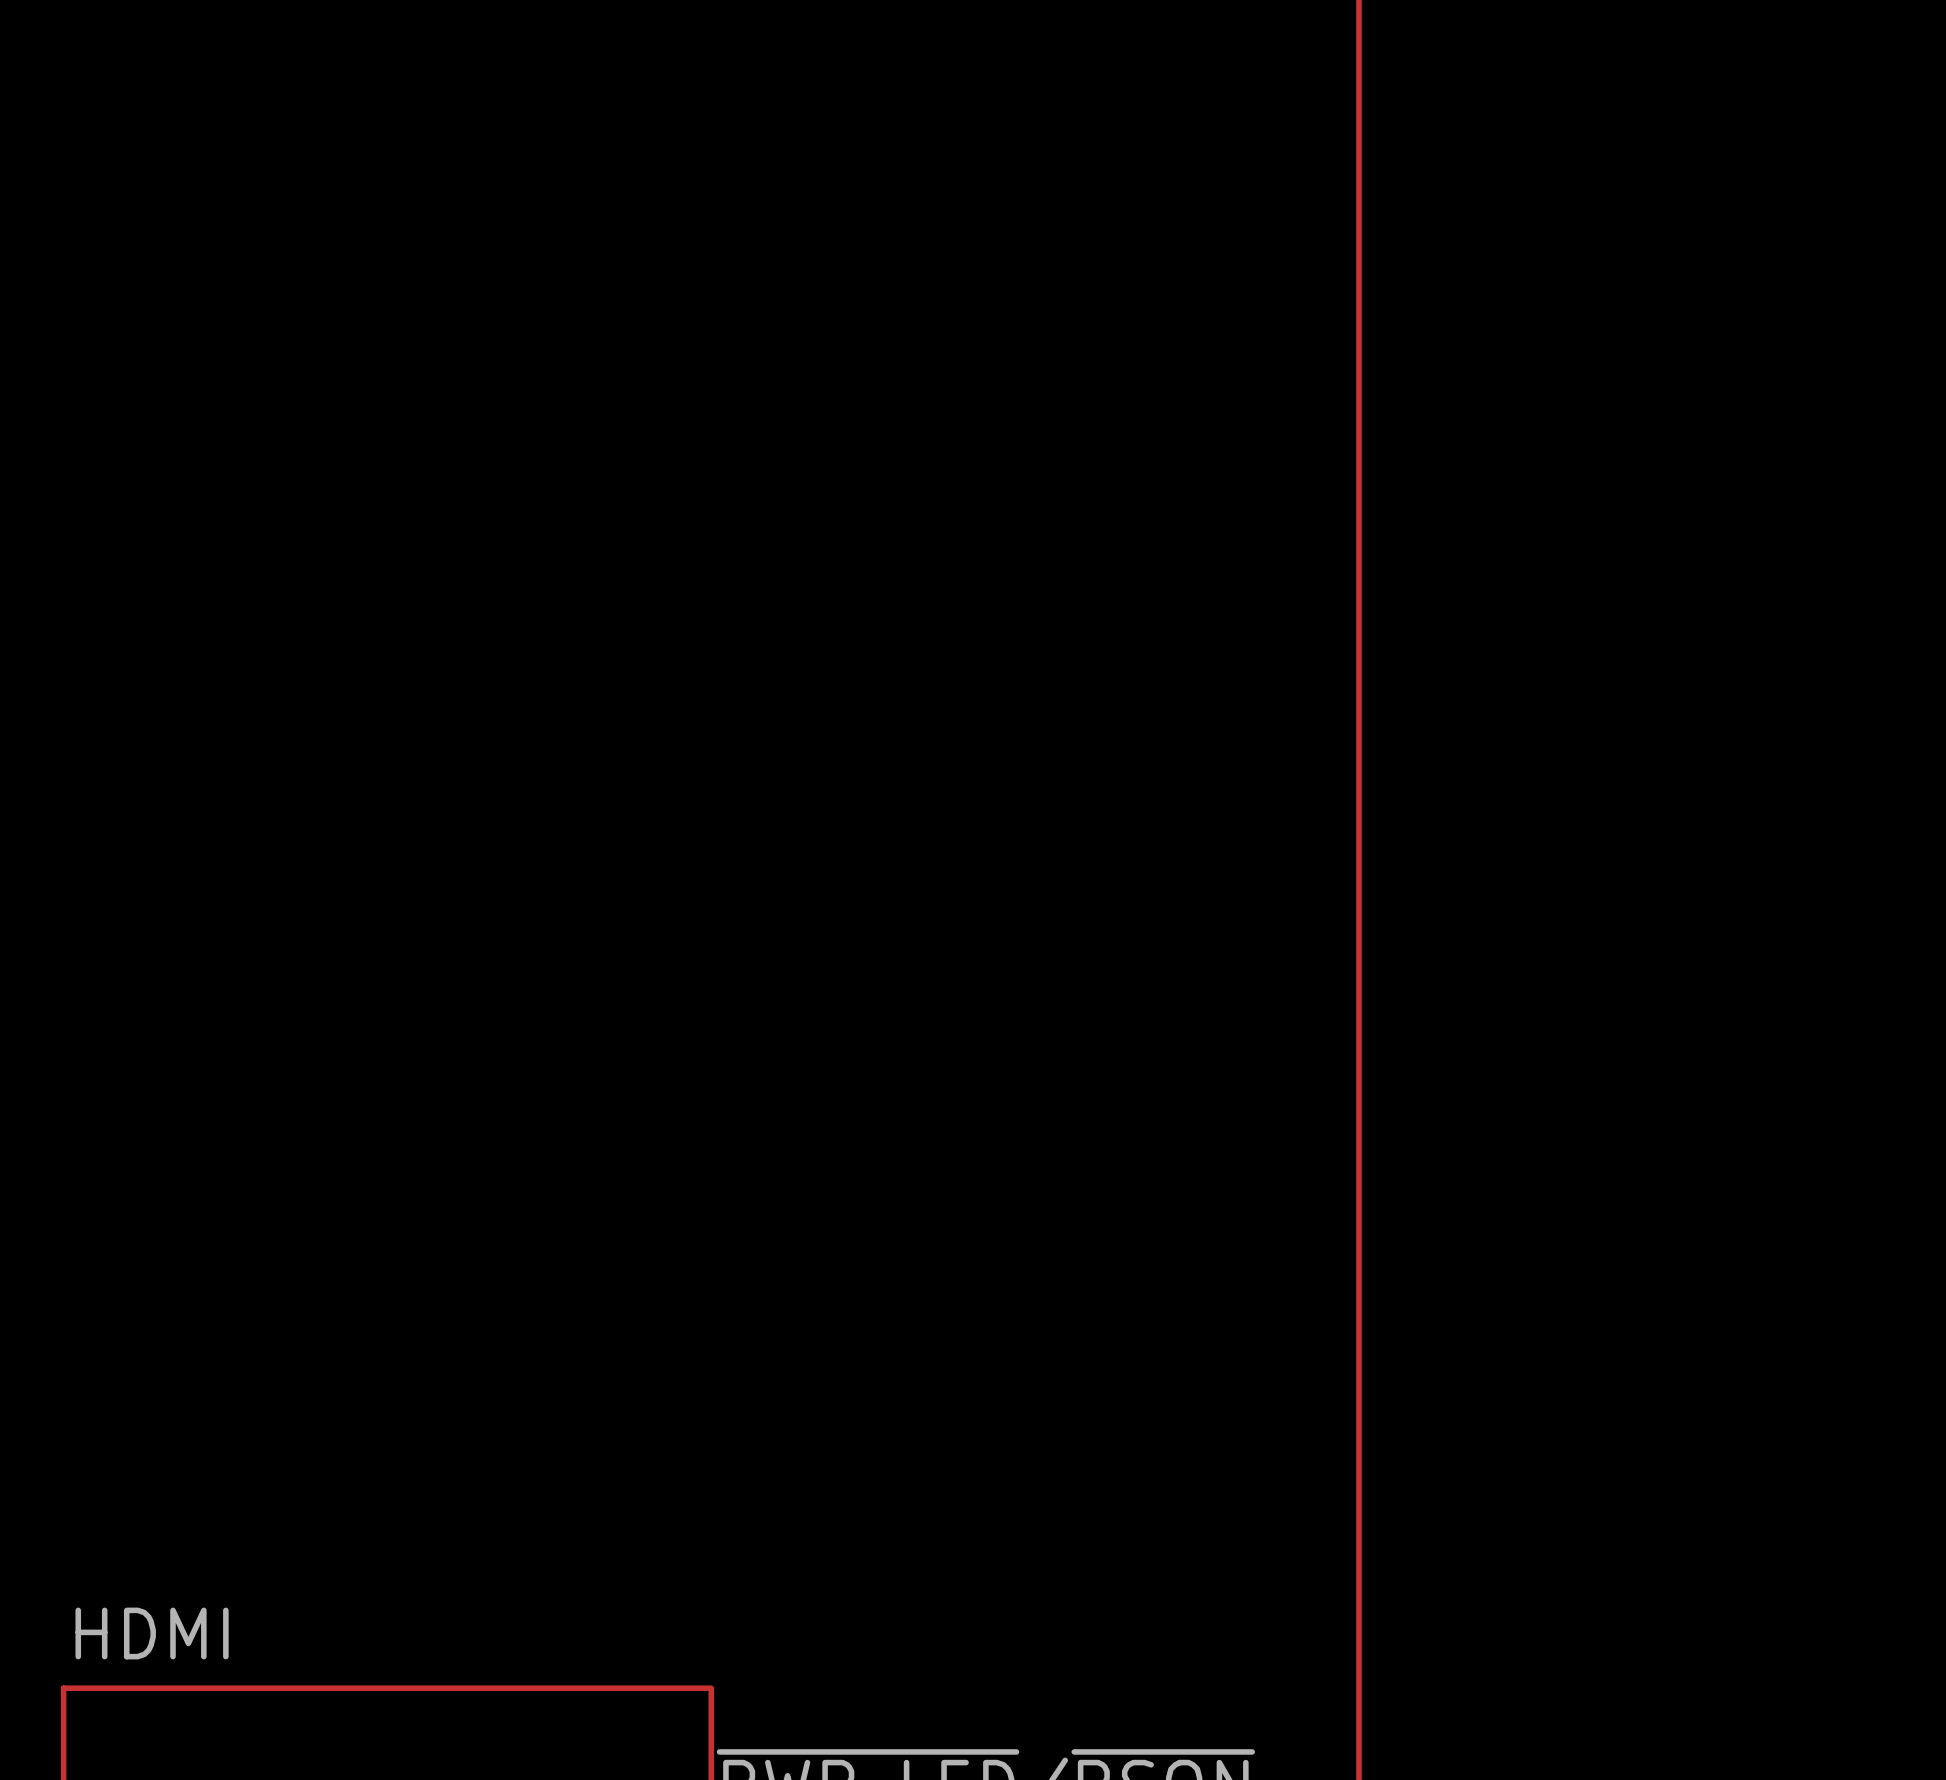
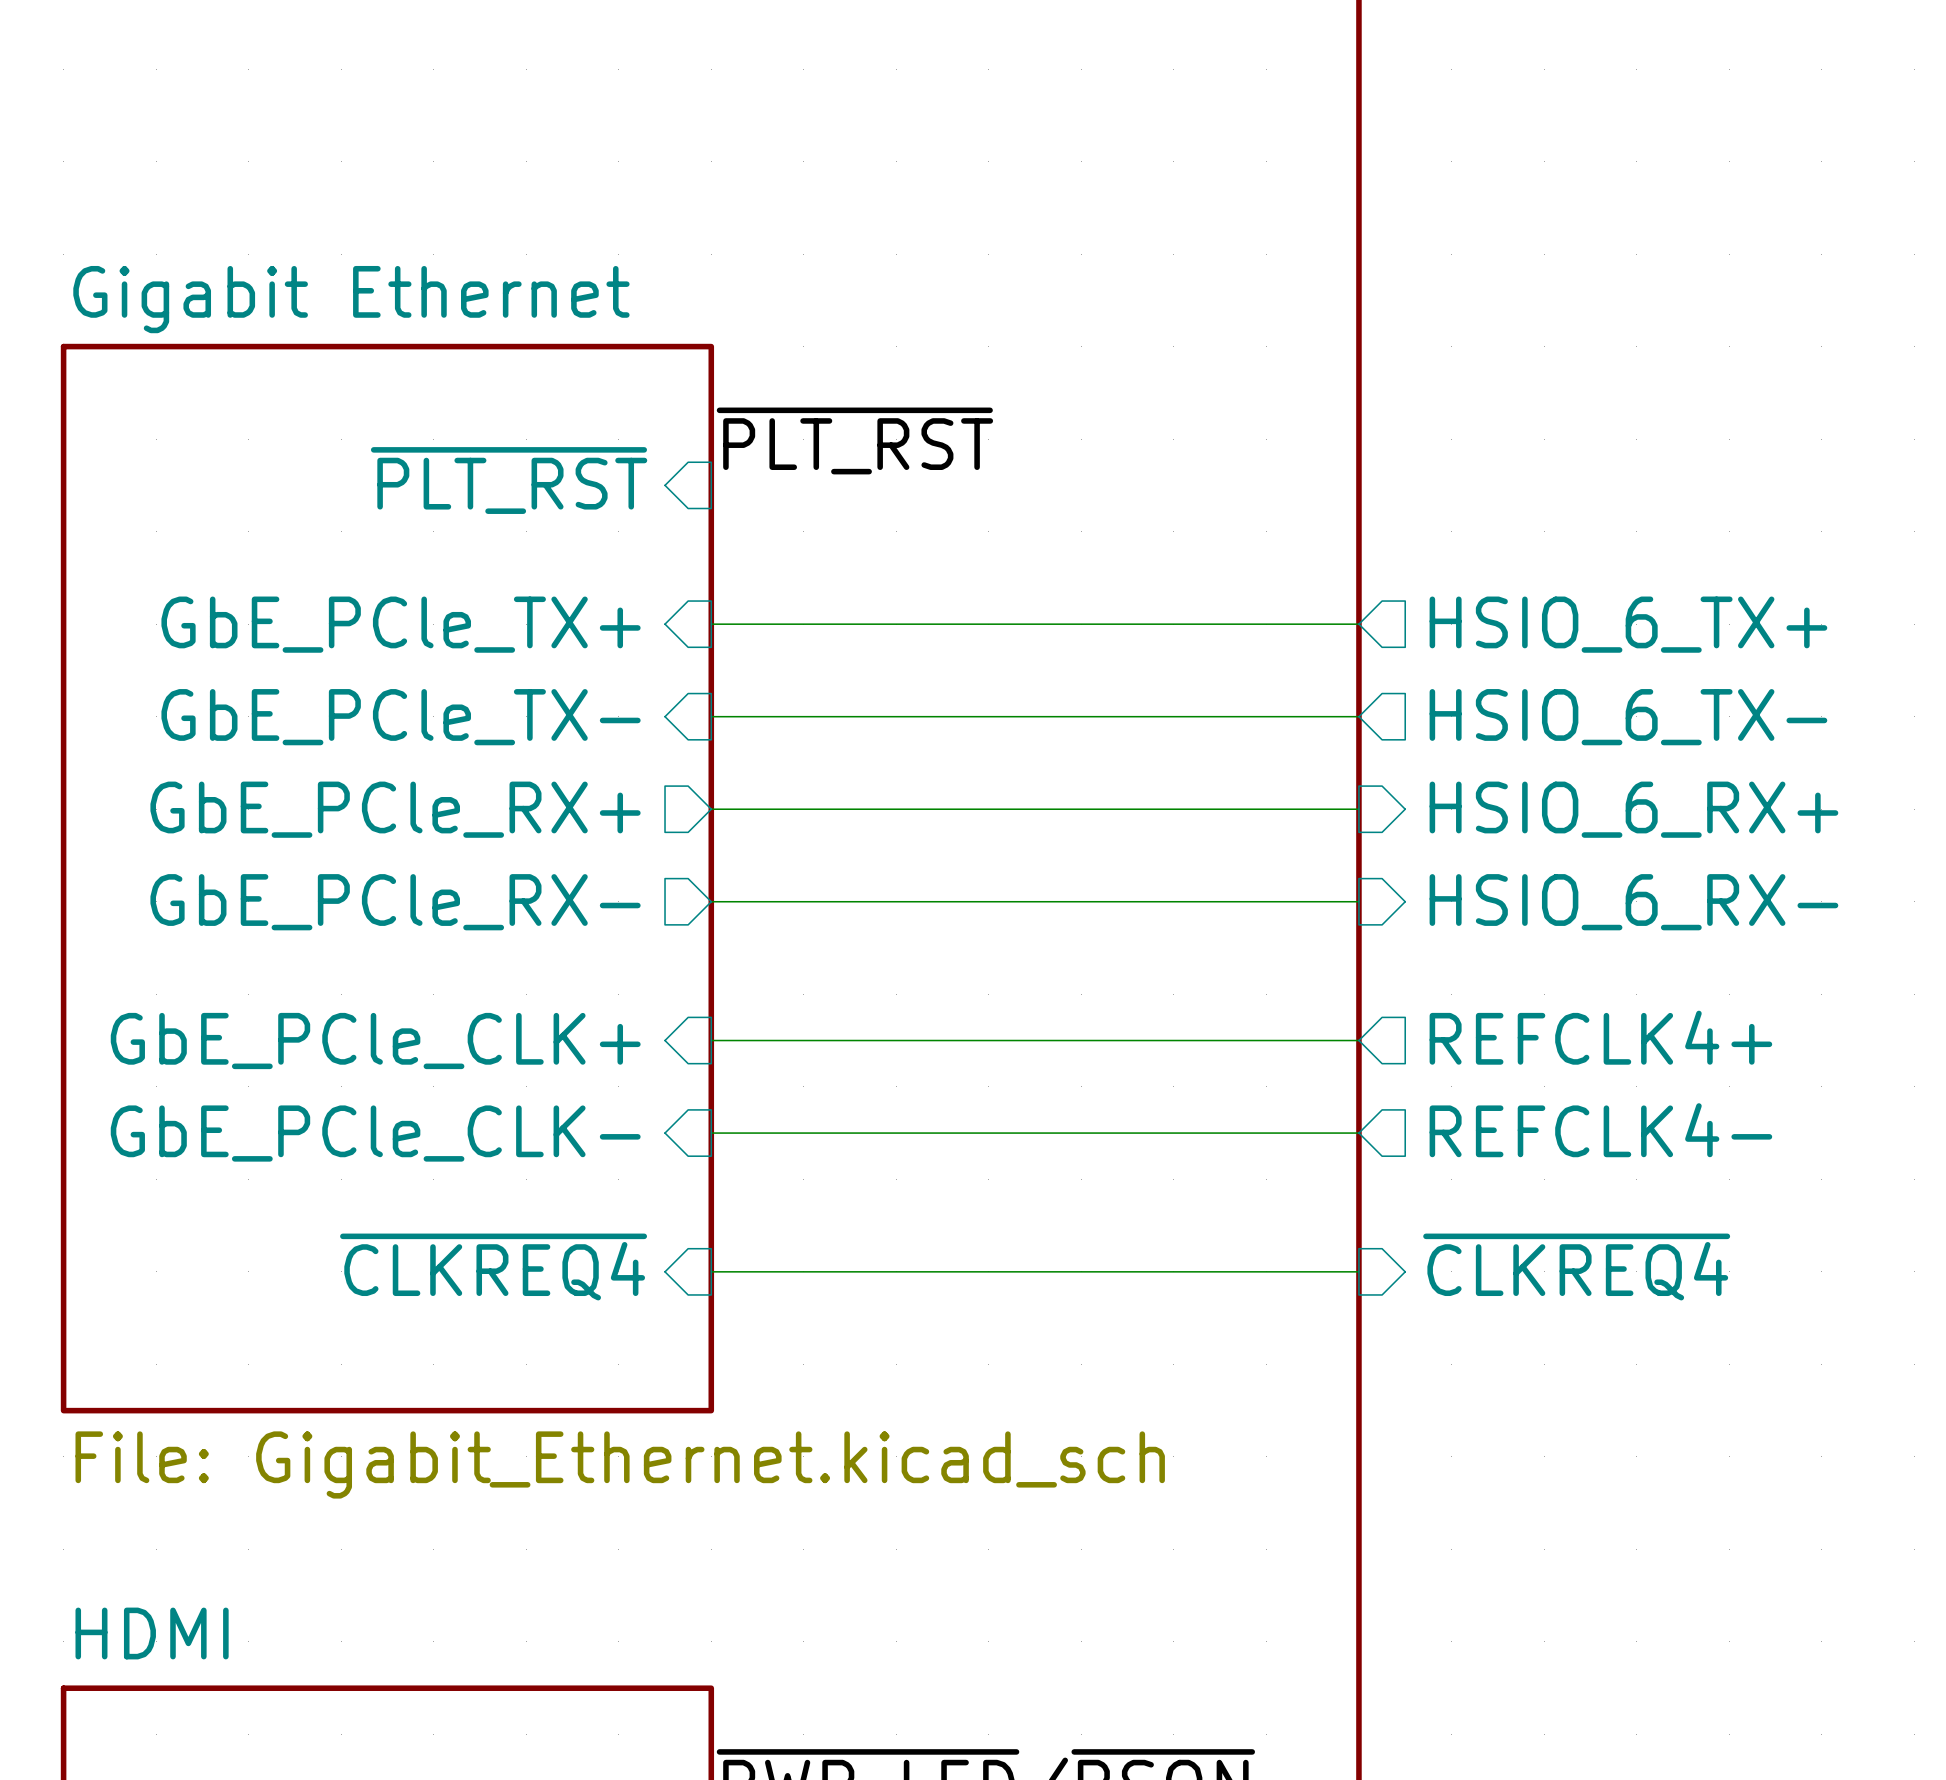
label: none -> ~{PLT_RST} (854, 440)
sheet pin: none -> ~{PLT_RST} (509, 480)
sheet pin: none -> GbE_PCle_TX+ (401, 624)
wire: none -> (711, 624) (1358, 624)
sheet pin: none -> HSIO_6_TX+ (1628, 624)
wire: none -> (711, 716) (1358, 716)
sheet pin: none -> GbE_PCle_TX- (401, 717)
sheet pin: none -> HSIO_6_TX- (1628, 717)
sheet pin: none -> GbE_PCle_RX+ (395, 809)
wire: none -> (711, 809) (1358, 809)
sheet pin: none -> HSIO_6_RX+ (1633, 809)
sheet Gigabit Ethernet: none -> File: Gigabit_Ethernet.kicad_sch (387, 878)
wire: none -> (711, 901) (1358, 901)
sheet pin: none -> GbE_PCle_RX- (395, 902)
sheet pin: none -> HSIO_6_RX- (1633, 902)
sheet pin: none -> REFCLK4+ (1600, 1037)
wire: none -> (711, 1040) (1358, 1040)
sheet pin: none -> GbE_PCle_CLK+ (375, 1041)
sheet pin: none -> REFCLK4- (1600, 1130)
sheet pin: none -> GbE_PCle_CLK- (375, 1133)
wire: none -> (711, 1133) (1358, 1133)
sheet pin: none -> ~{CLKREQ4} (493, 1267)
sheet pin: none -> ~{CLKREQ4} (1576, 1267)
wire: none -> (711, 1271) (1358, 1271)

